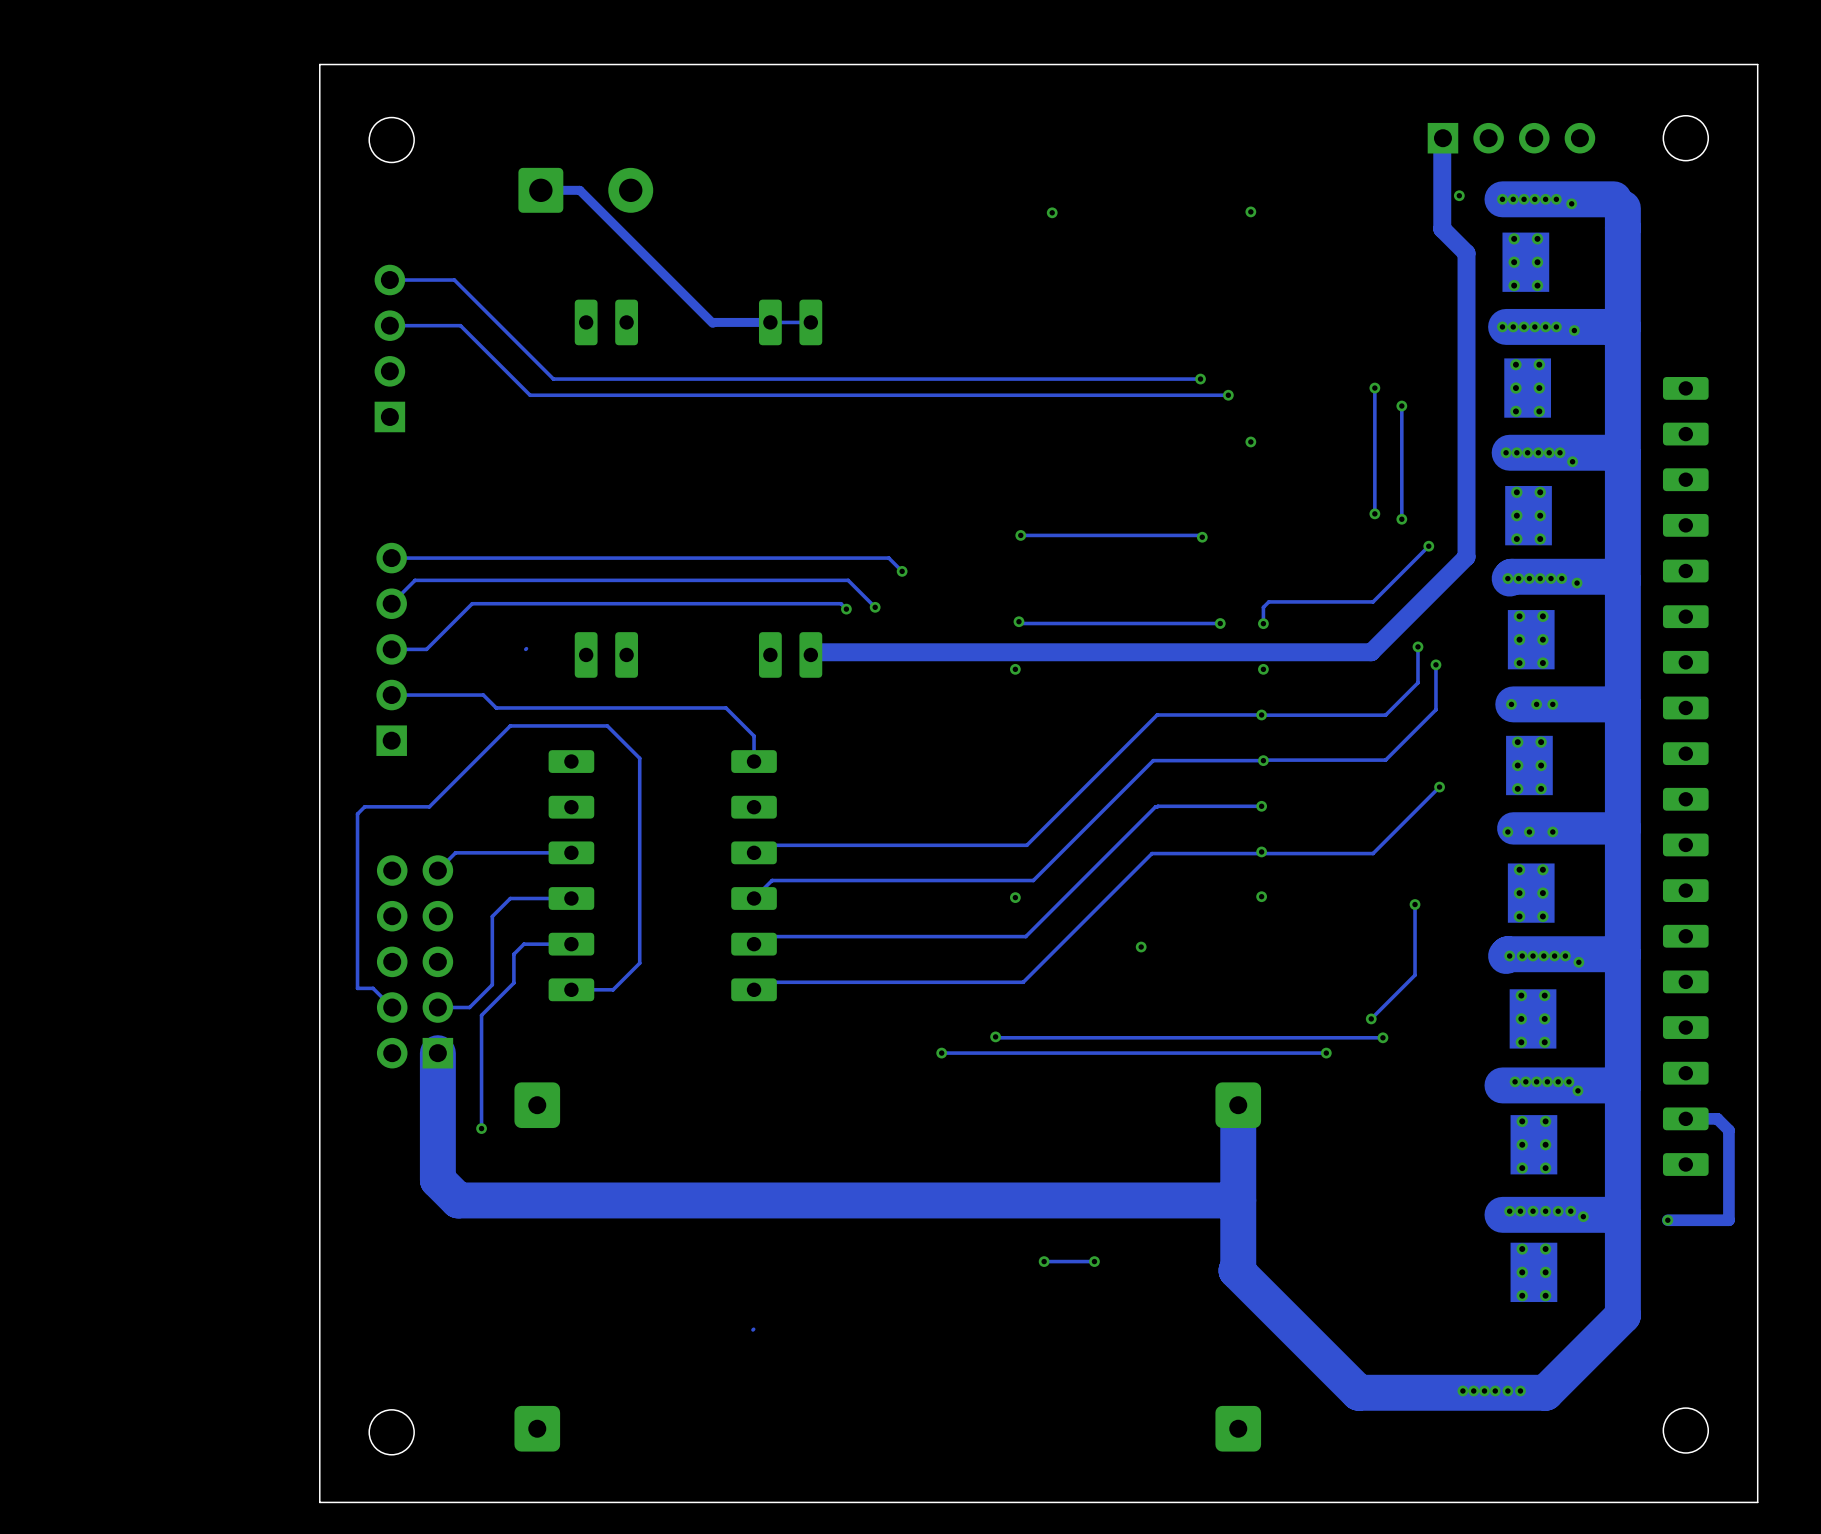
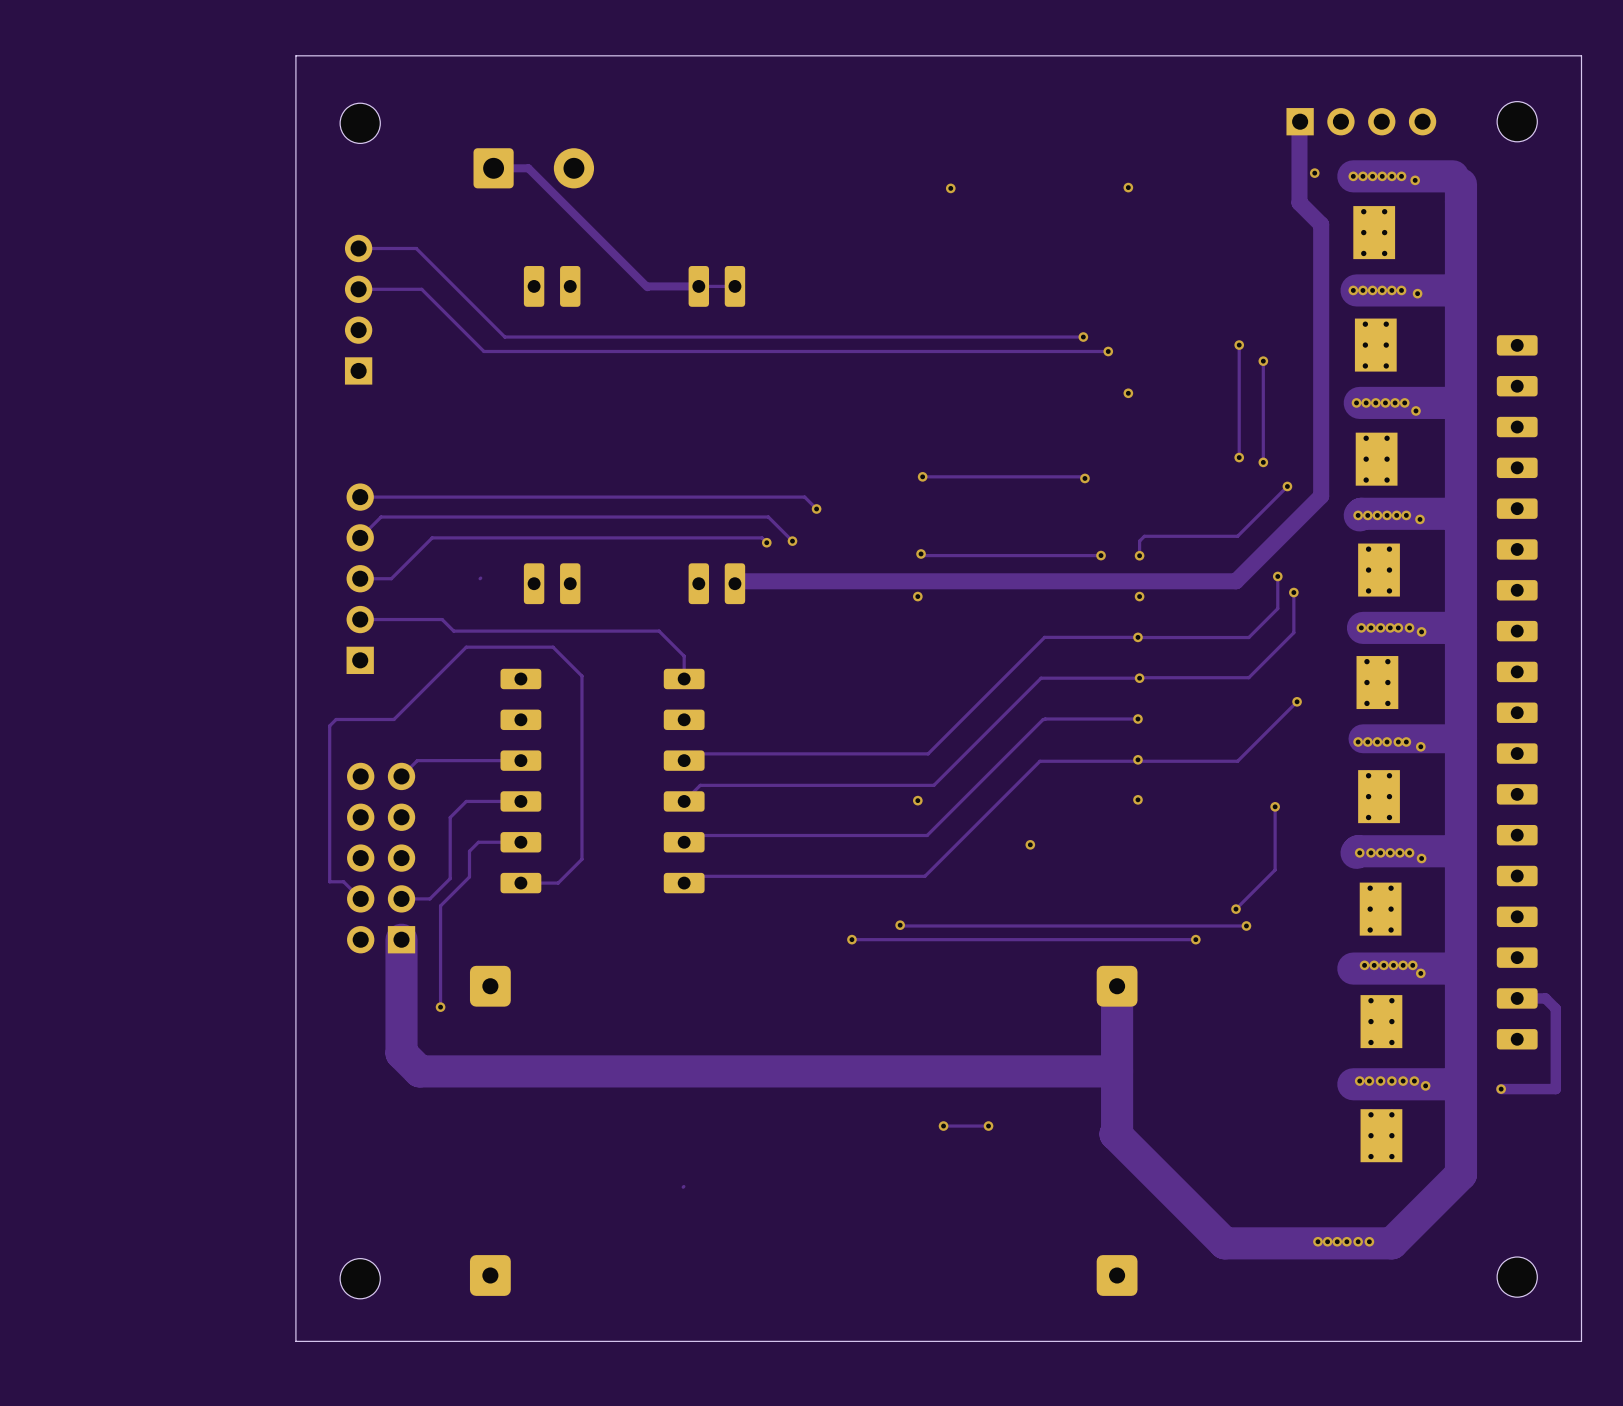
via: none -> (1370, 627)
via: none -> (1380, 627)
via: (1536, 704) -> none
via: none -> (1390, 627)
via: none -> (1409, 627)
via: none -> (1421, 631)
via: none -> (1367, 741)
via: none -> (1387, 741)
via: none -> (1406, 741)
via: none -> (1420, 746)

